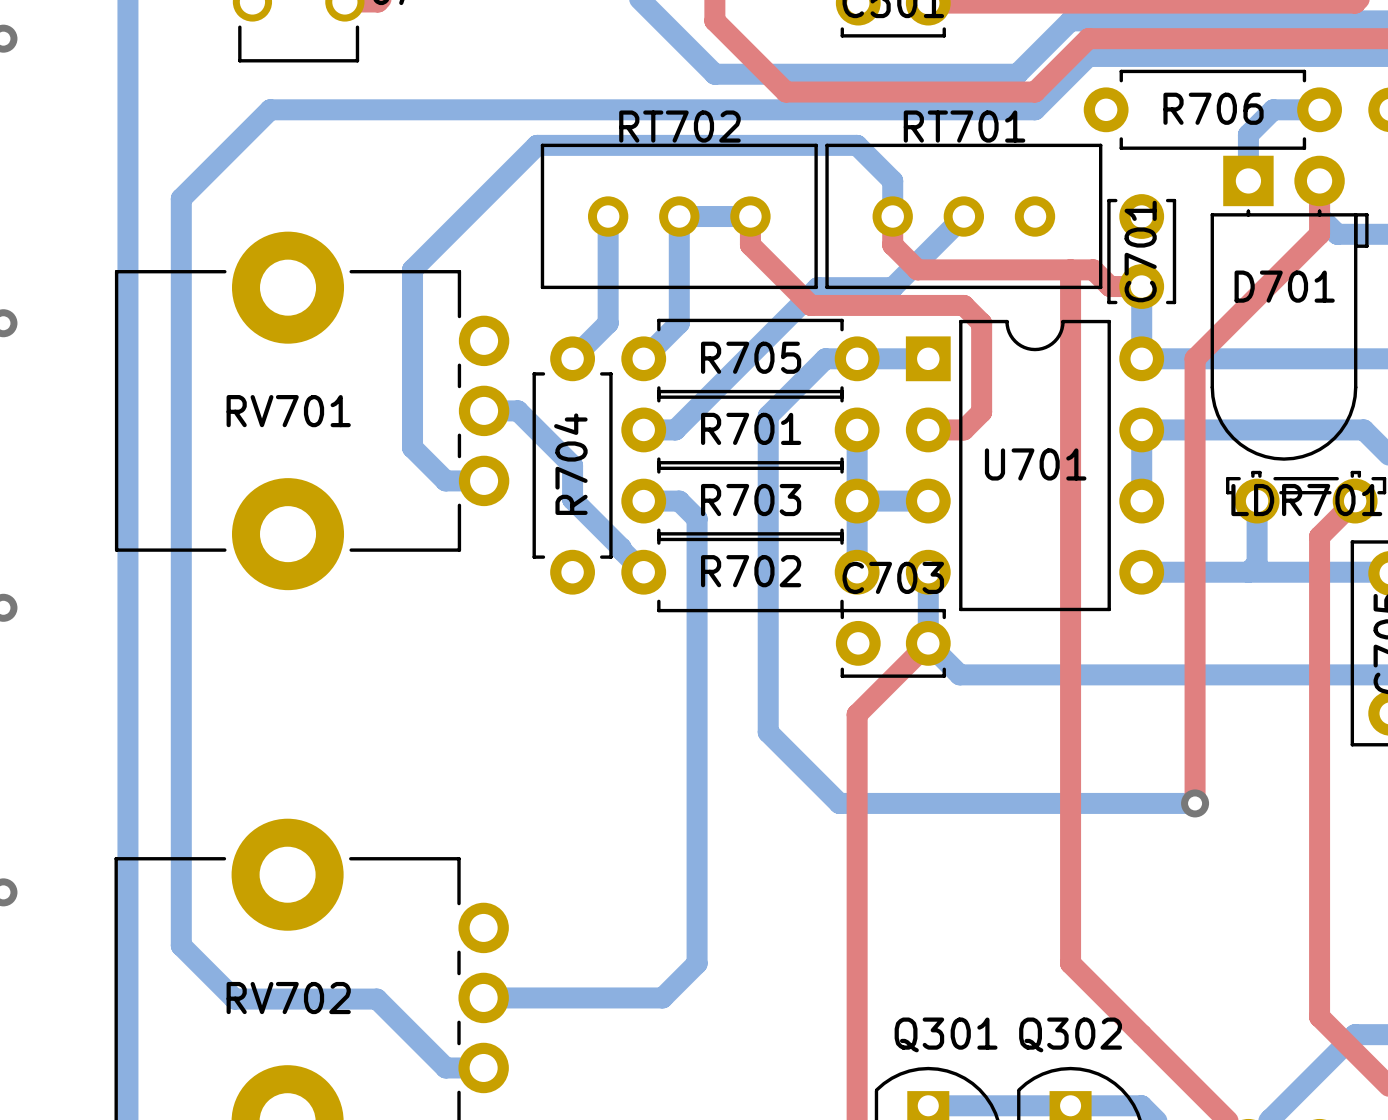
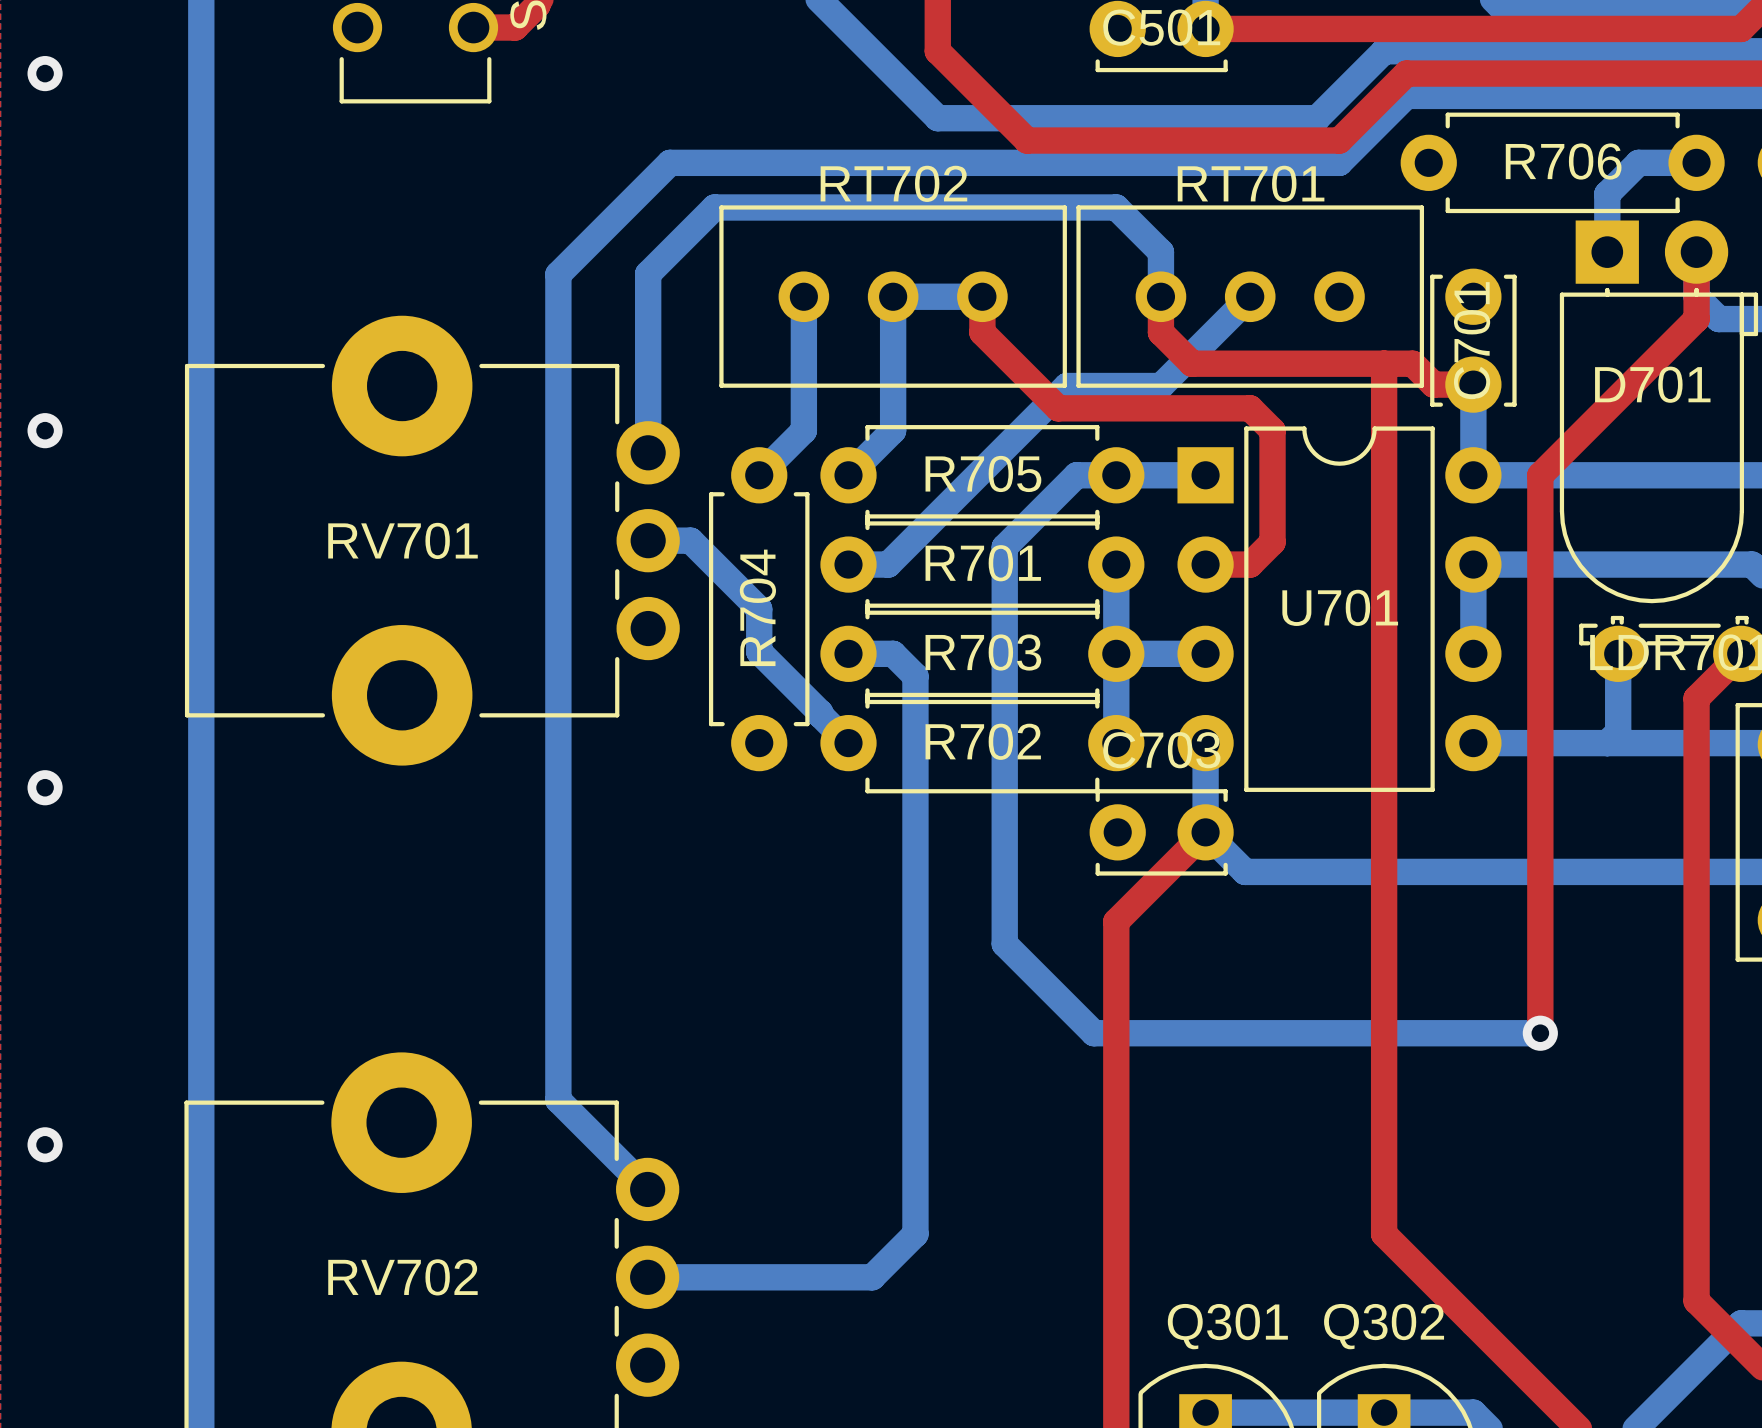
bottom track: (501, 109) (270, 109) (181, 198) (181, 945) (234, 999) (376, 999) (445, 1067) (483, 1067) -> none
bottom track: (484, 198) (412, 269) -> (669, 162) (558, 274) (558, 363)
bottom track: none -> (648, 273) (648, 452)
bottom track: (412, 447) (445, 480) (484, 480) -> (558, 586) (558, 1100) (647, 1189)

